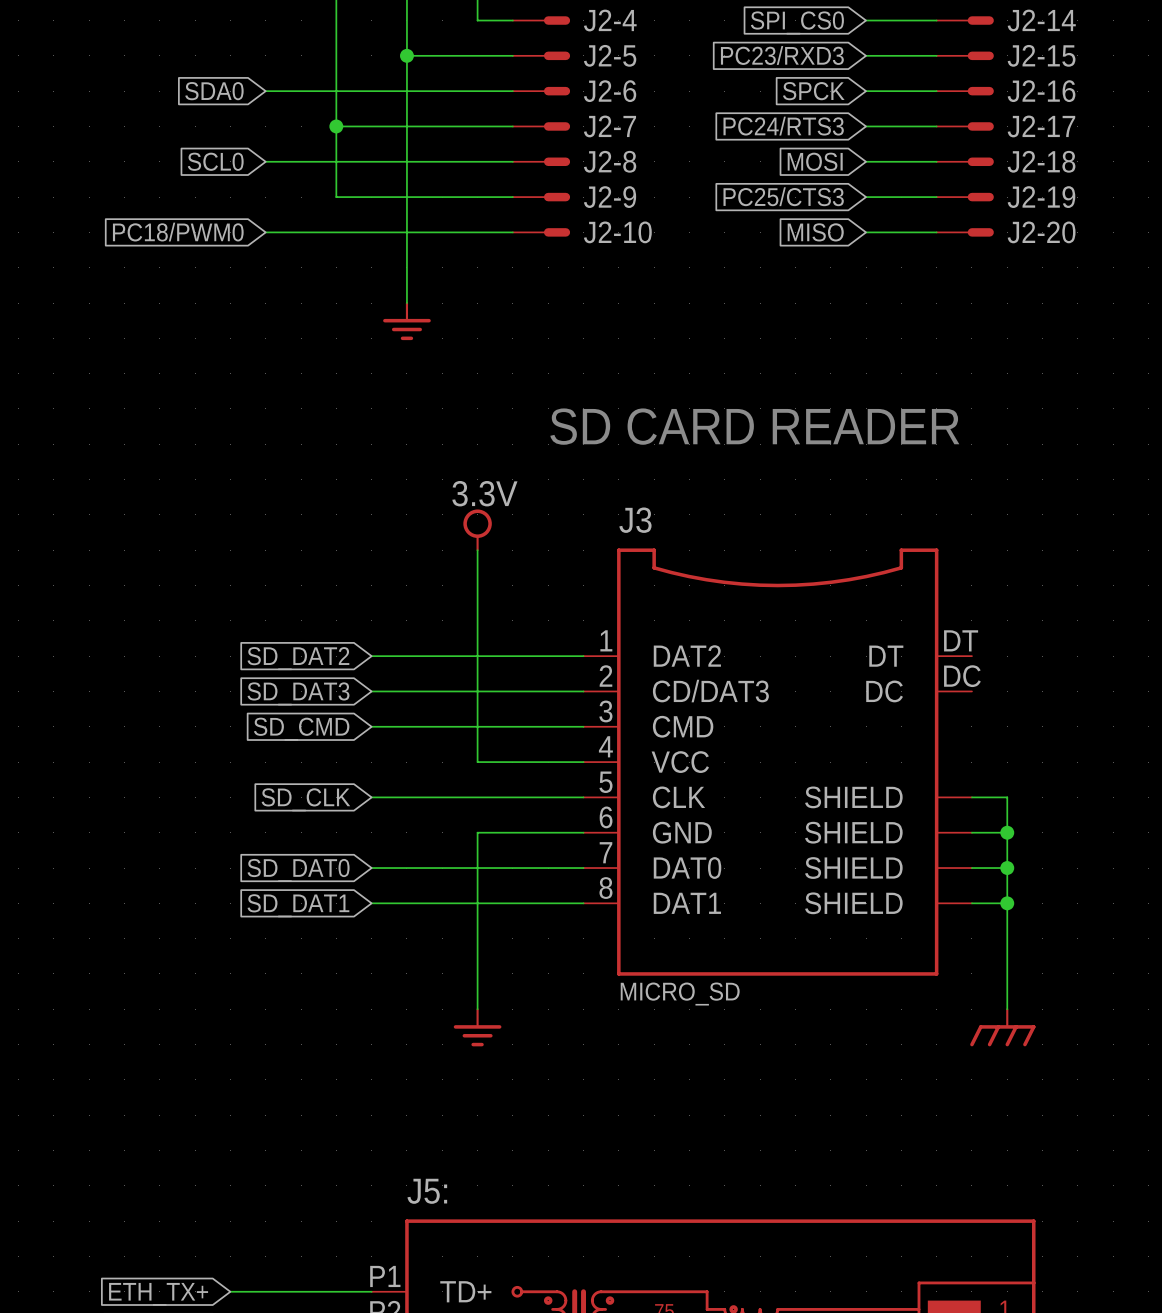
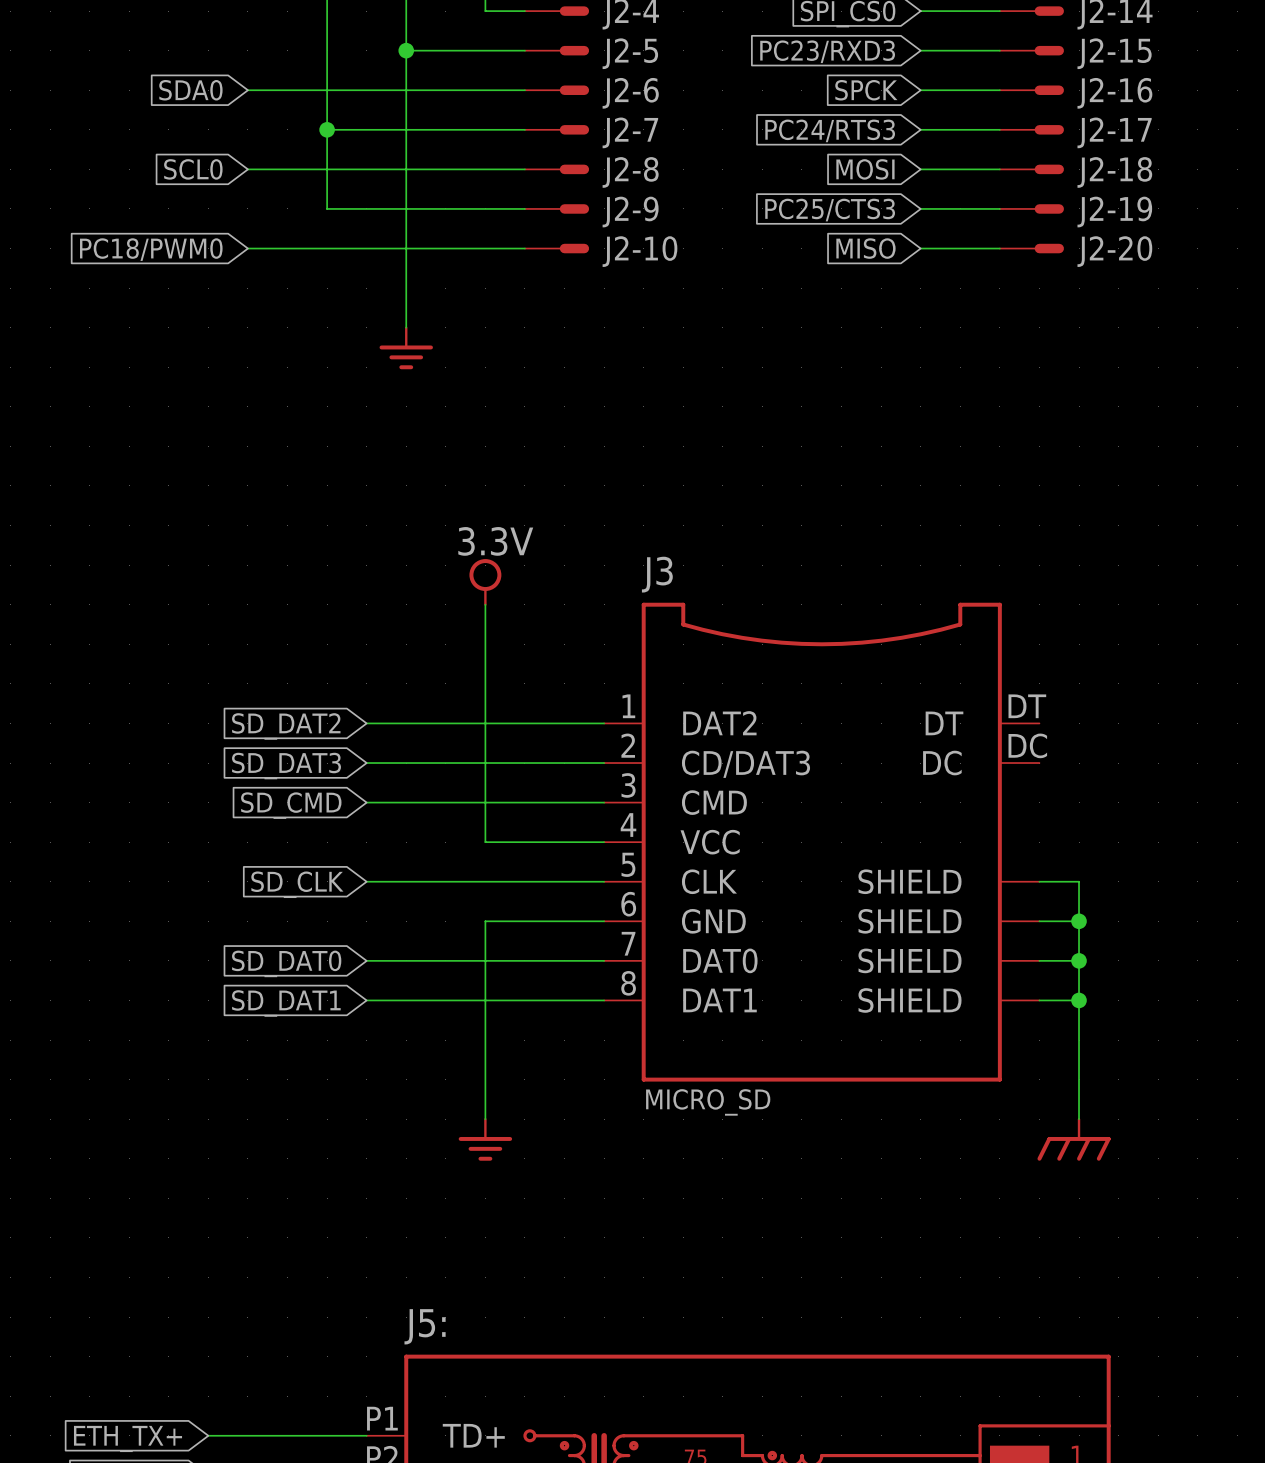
text: SD CARD READER (754, 426) -> none

